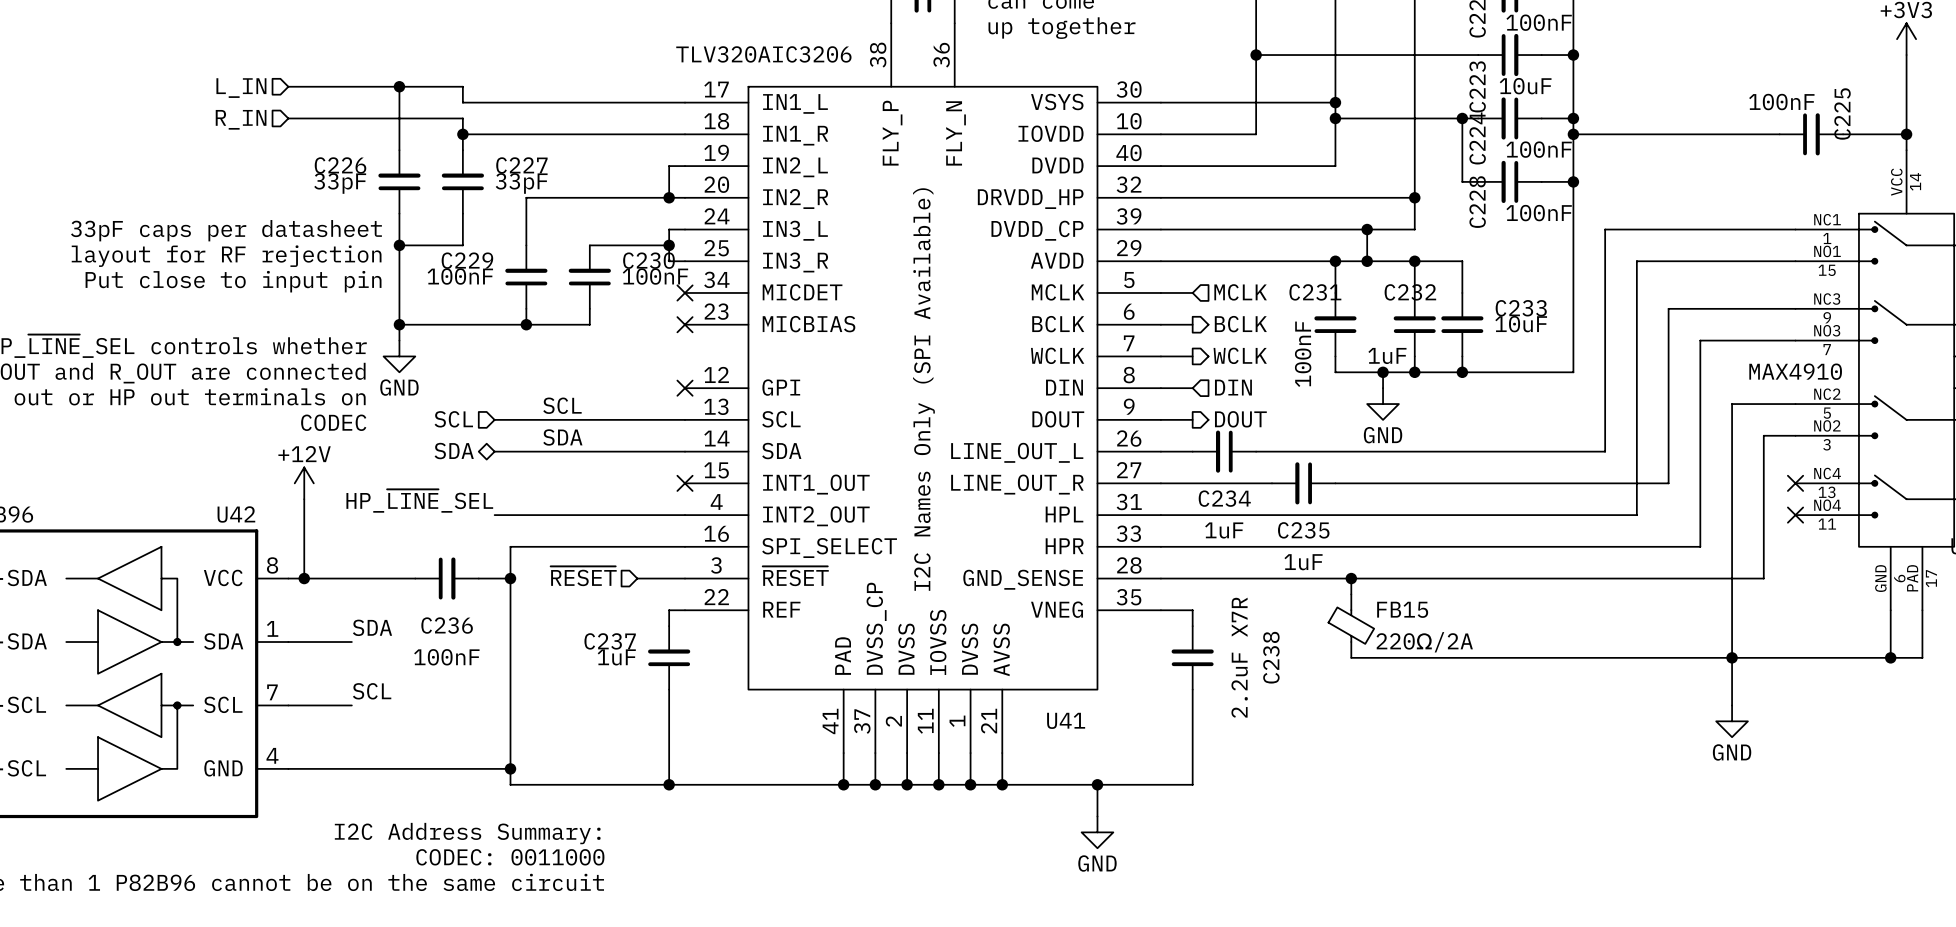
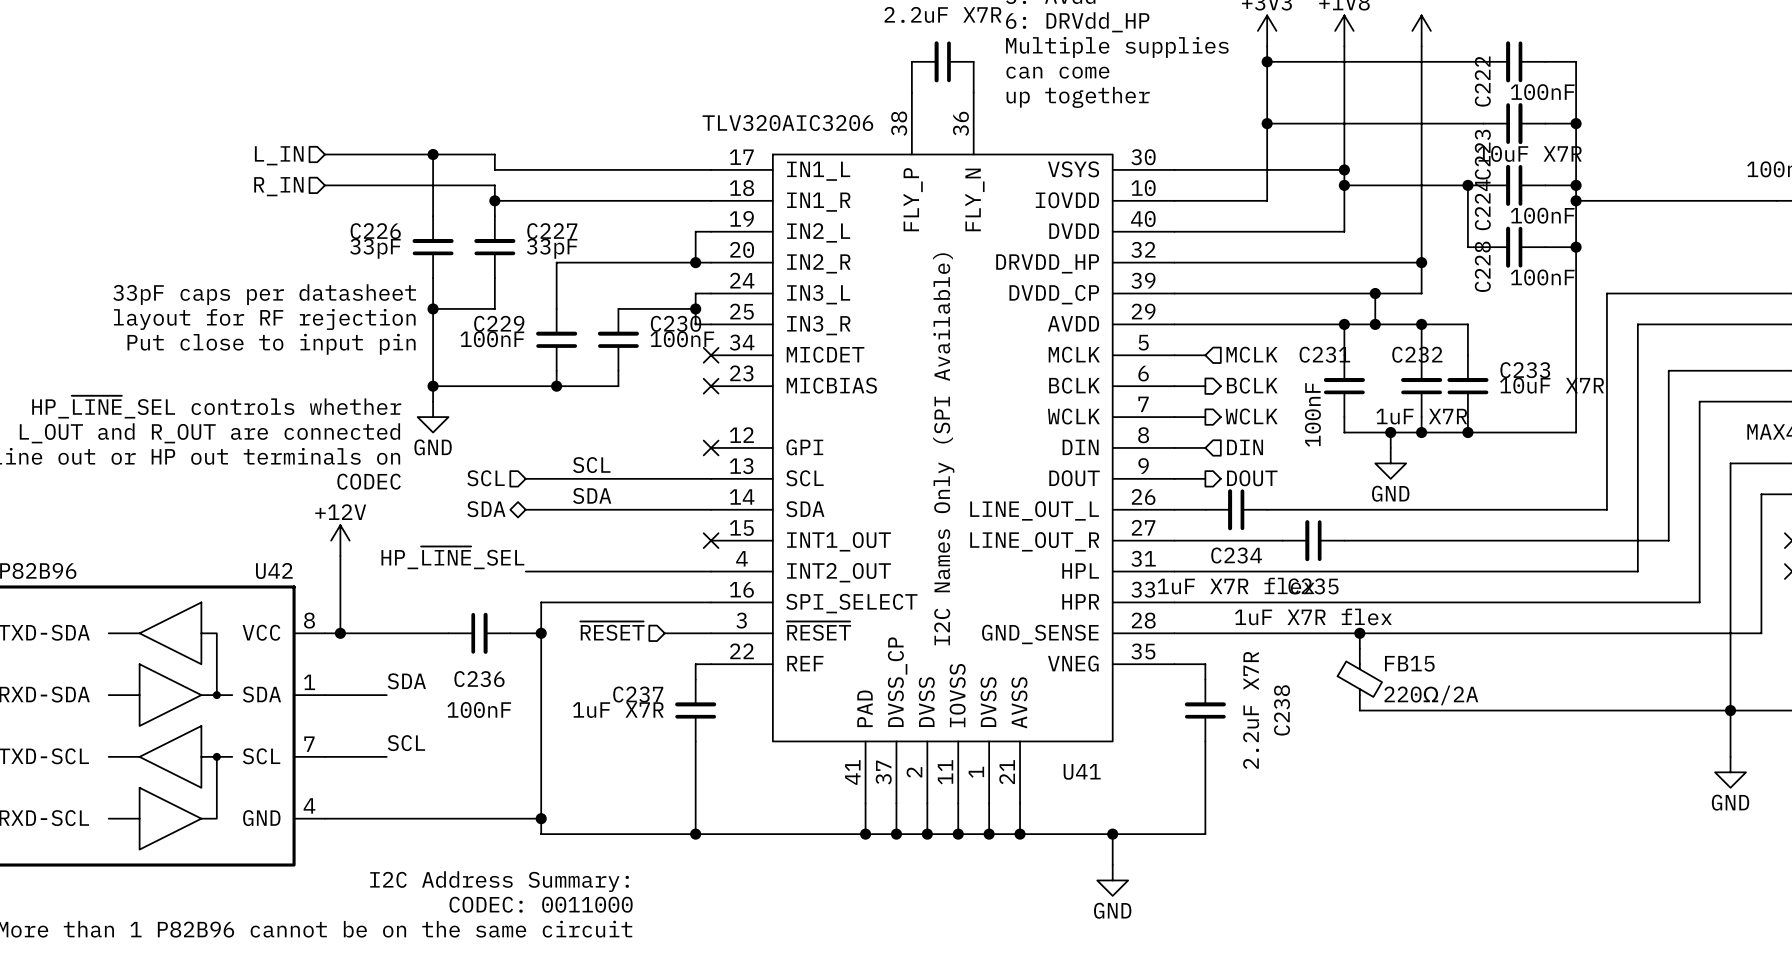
C223 value: 10uF (1525, 86) -> 10uF X7R (1529, 153)
C233 value: 10uF (1521, 324) -> 10uF X7R (1551, 385)
C232 value: 1uF (1387, 355) -> 1uF X7R (1421, 416)
C234 value: 1uF (1224, 530) -> 1uF X7R flex (1236, 586)
C235 value: 1uF (1303, 562) -> 1uF X7R flex (1313, 616)
C237 value: 1uF (616, 657) -> 1uF X7R (618, 710)

